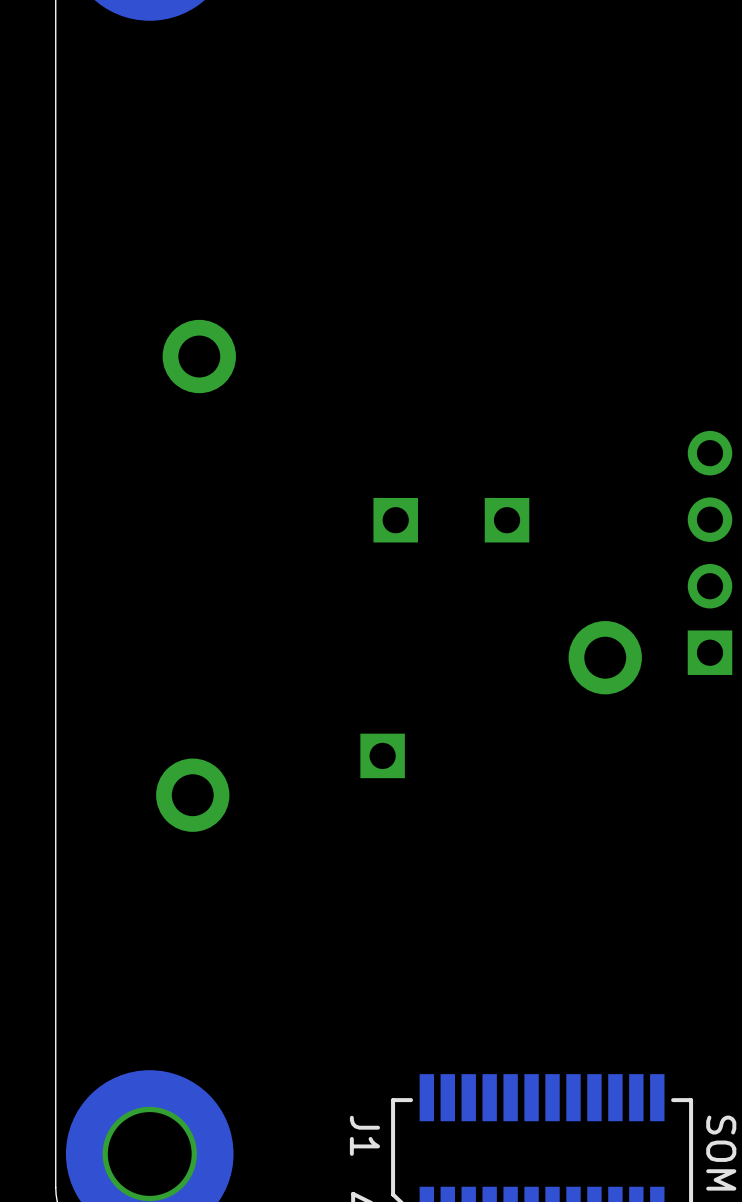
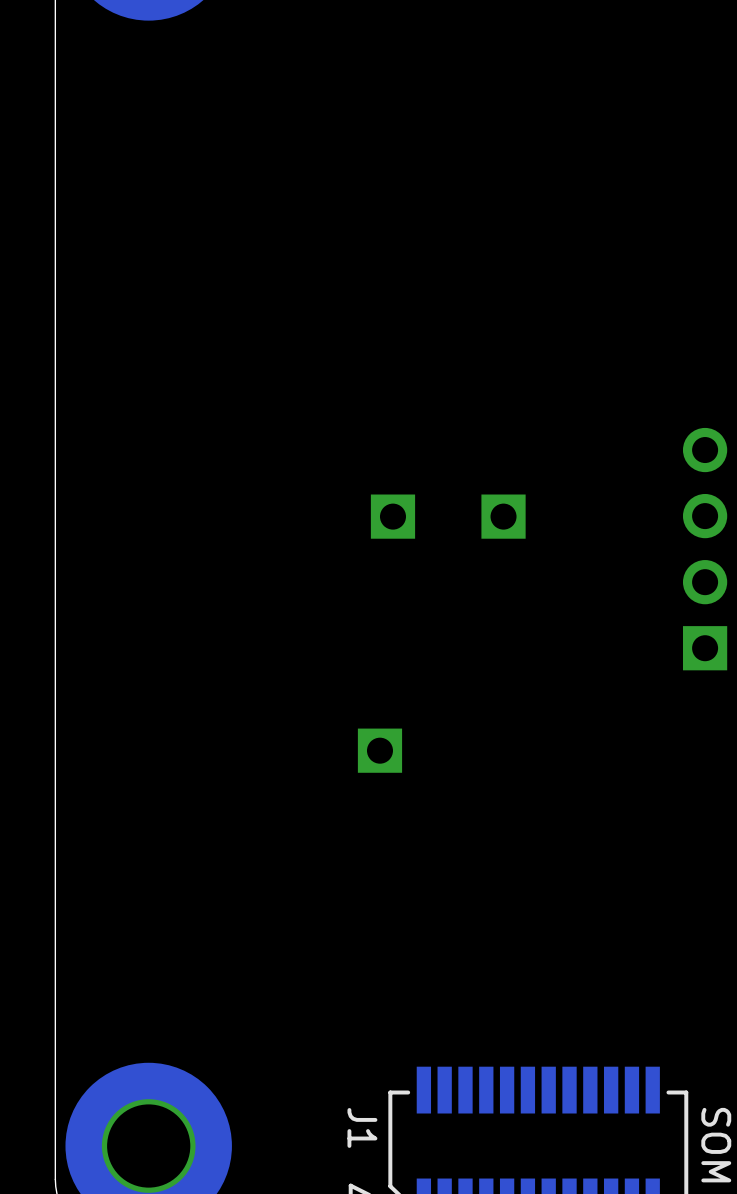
part: (199, 356) -> none
part: (605, 657) -> none
part: (192, 795) -> none

